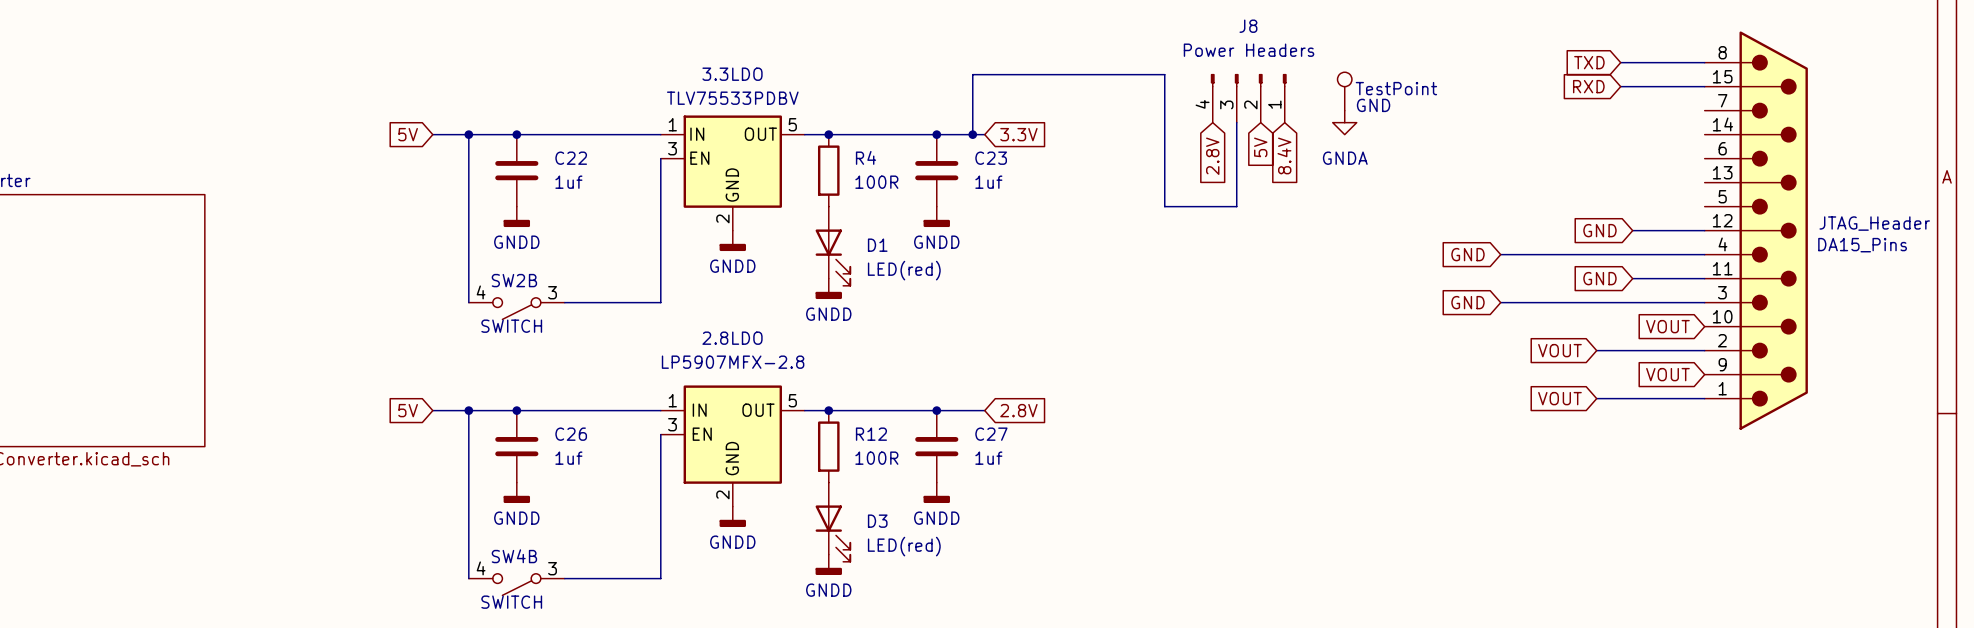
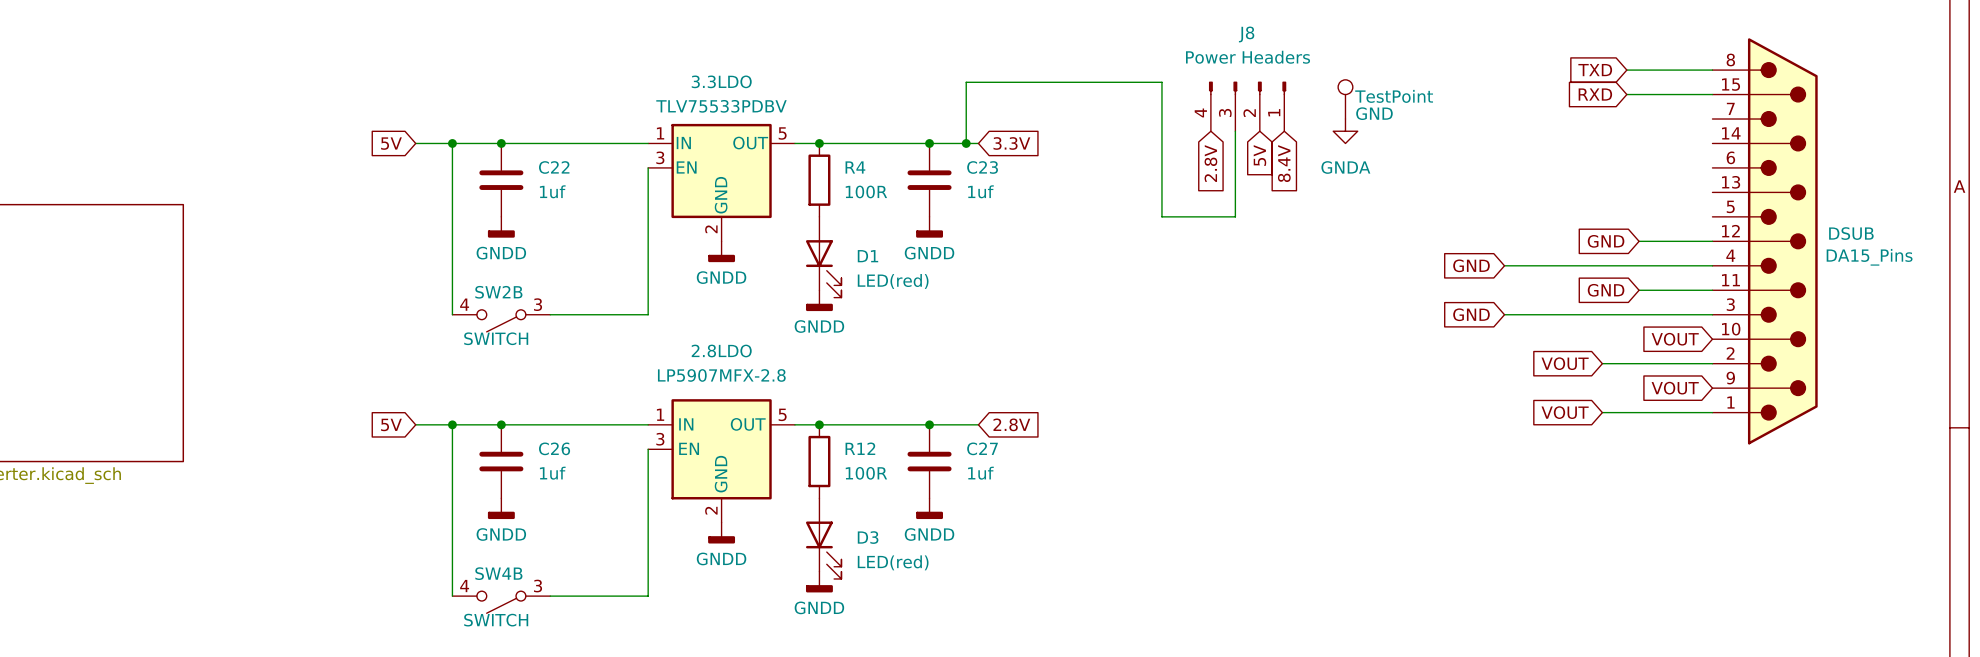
JTAG_Header name: JTAG_Header (1874, 223) -> DSUB (1851, 233)

